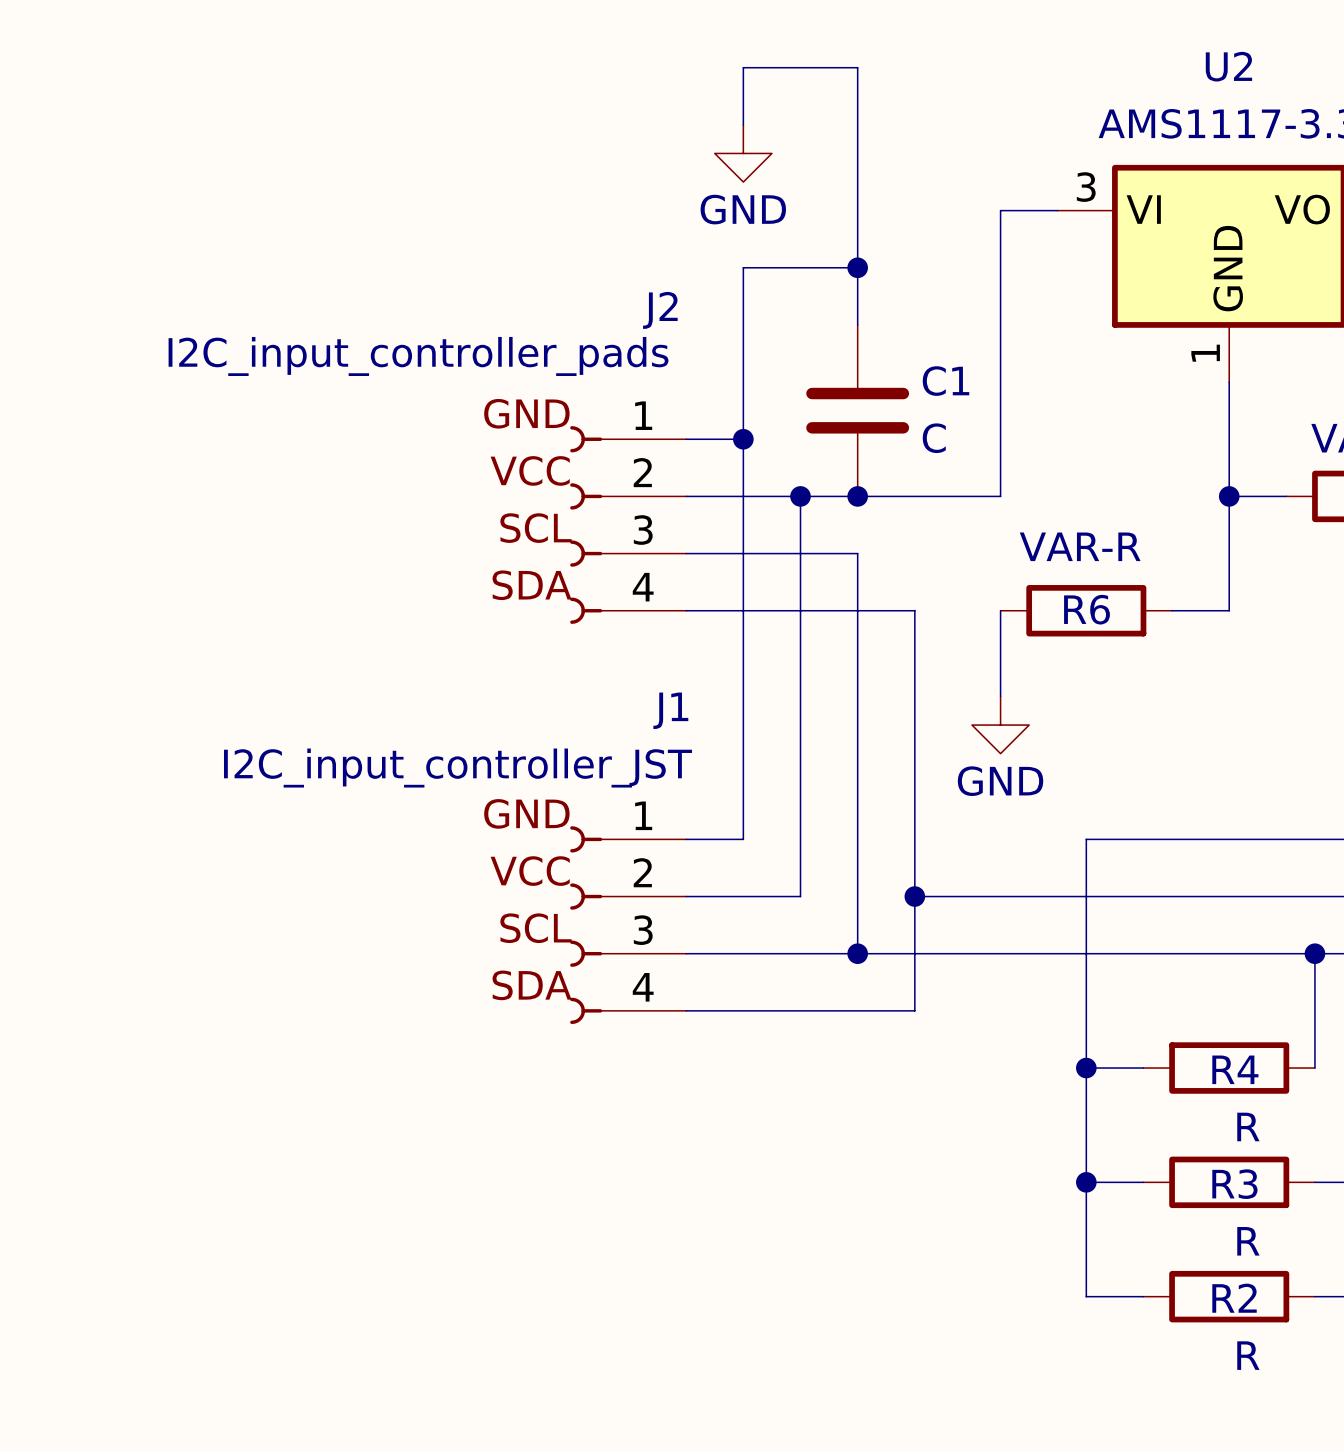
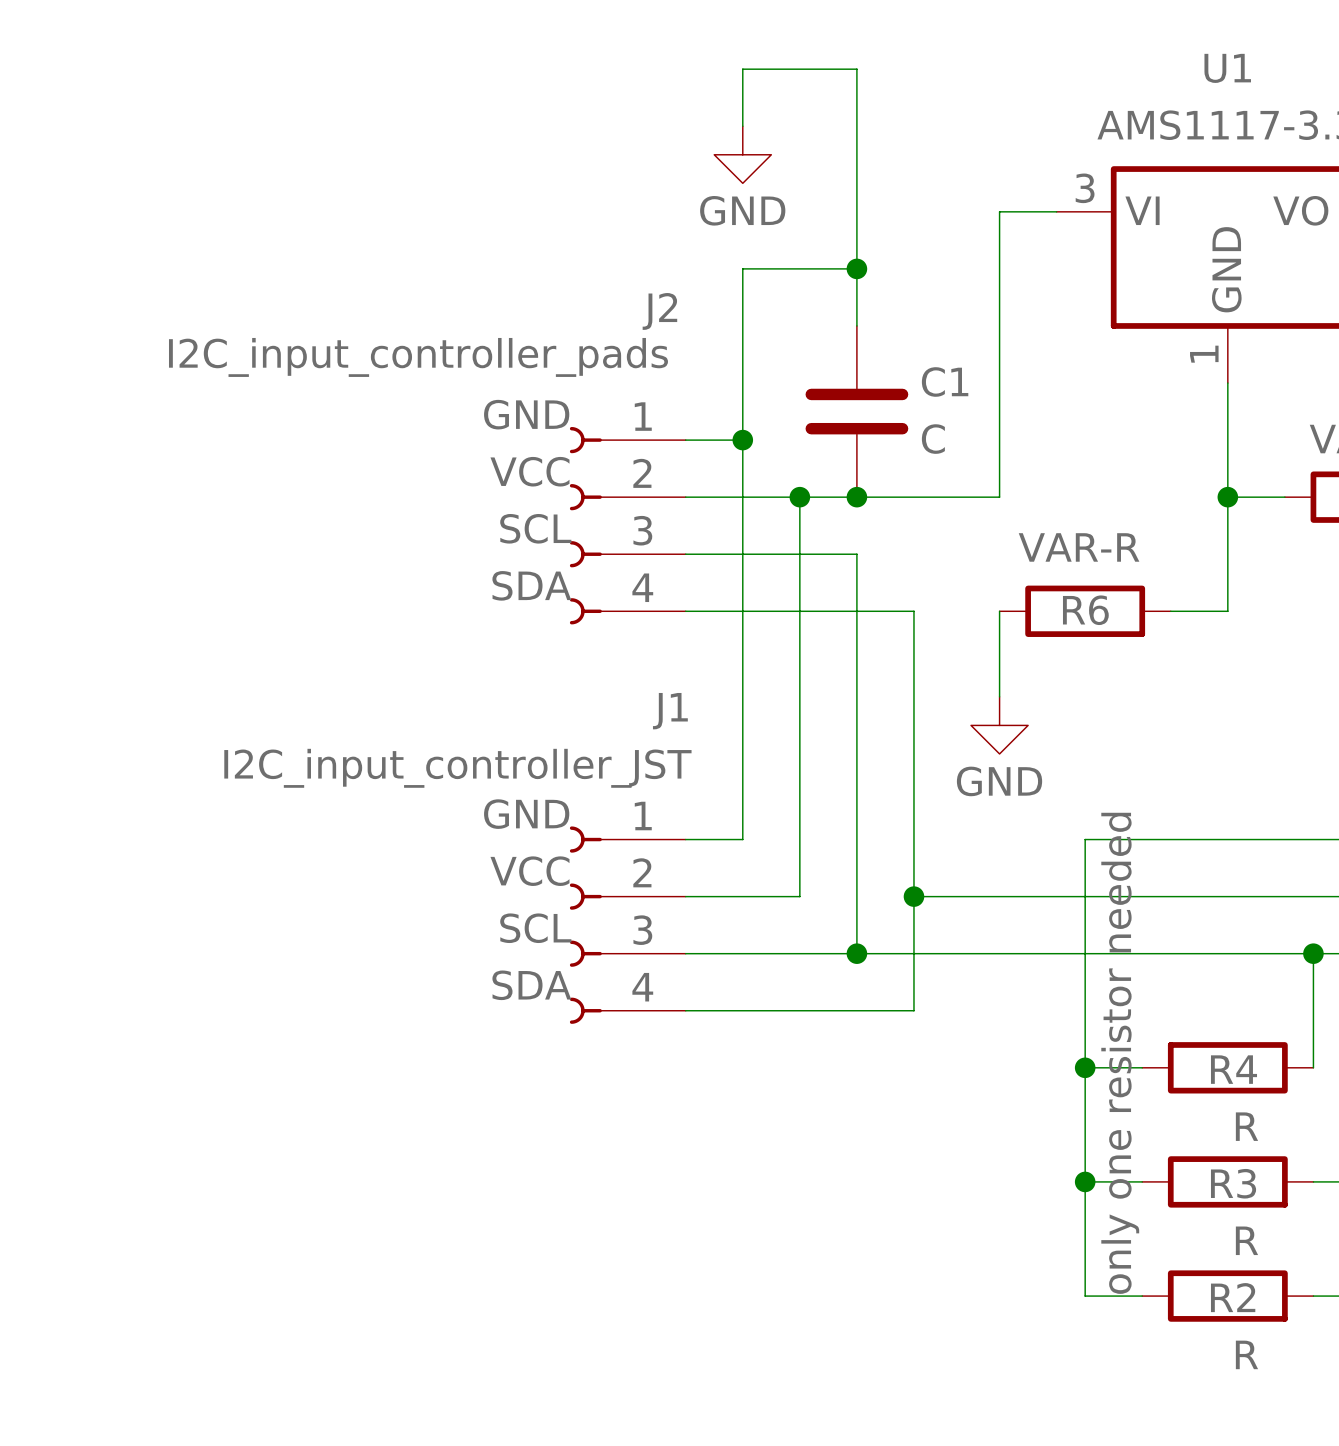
U2 name: U2 (1228, 66) -> U1 (1227, 68)
label: none -> only one resistor needed (1120, 1053)

